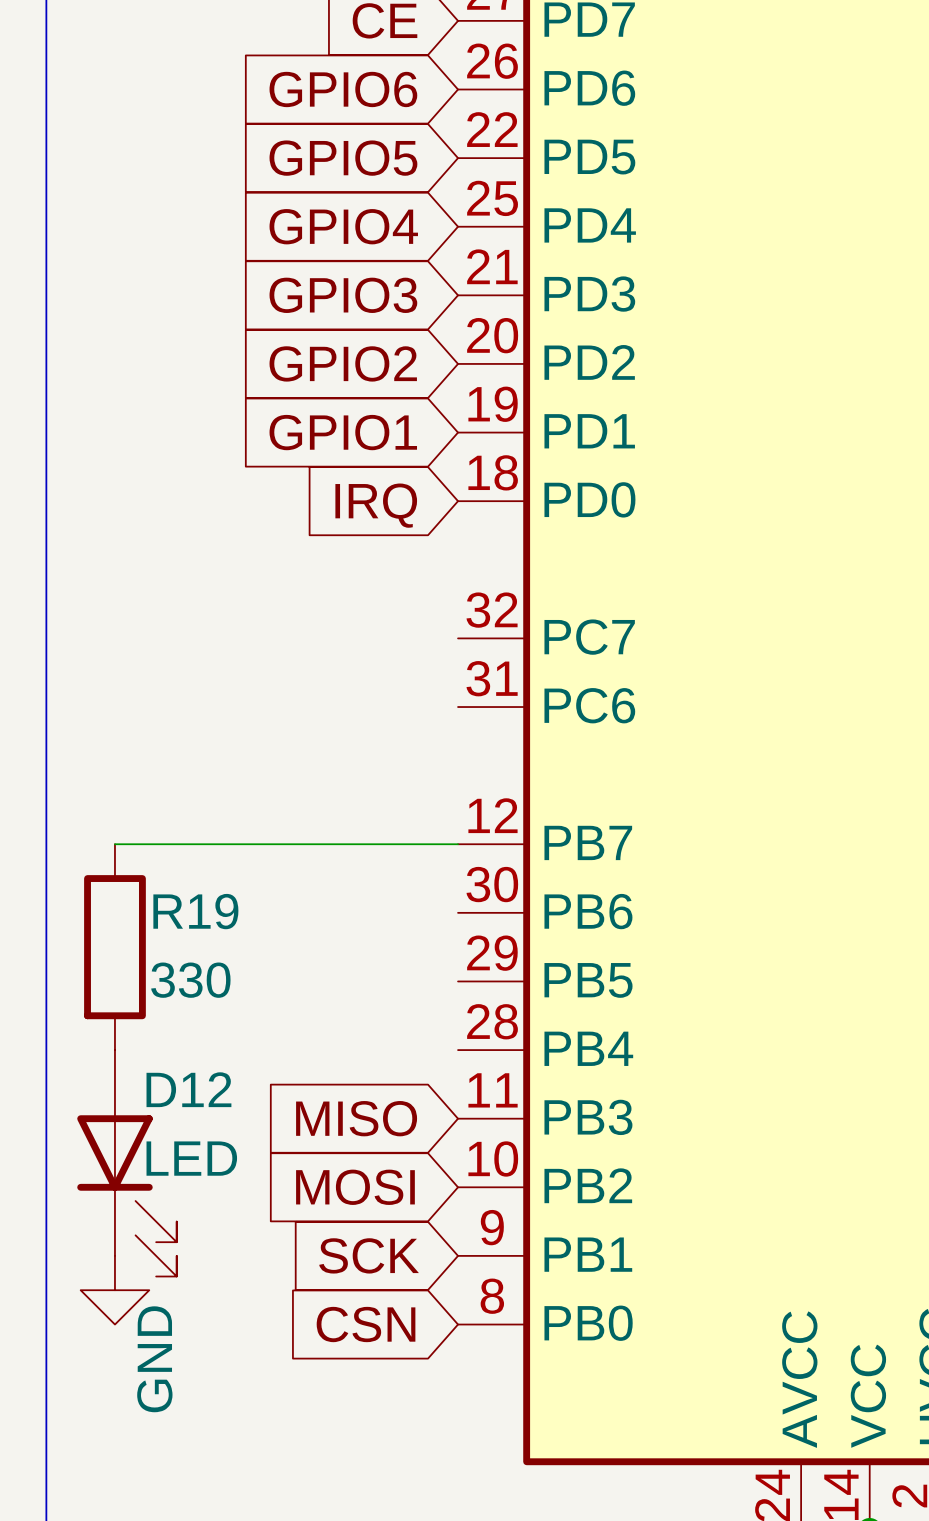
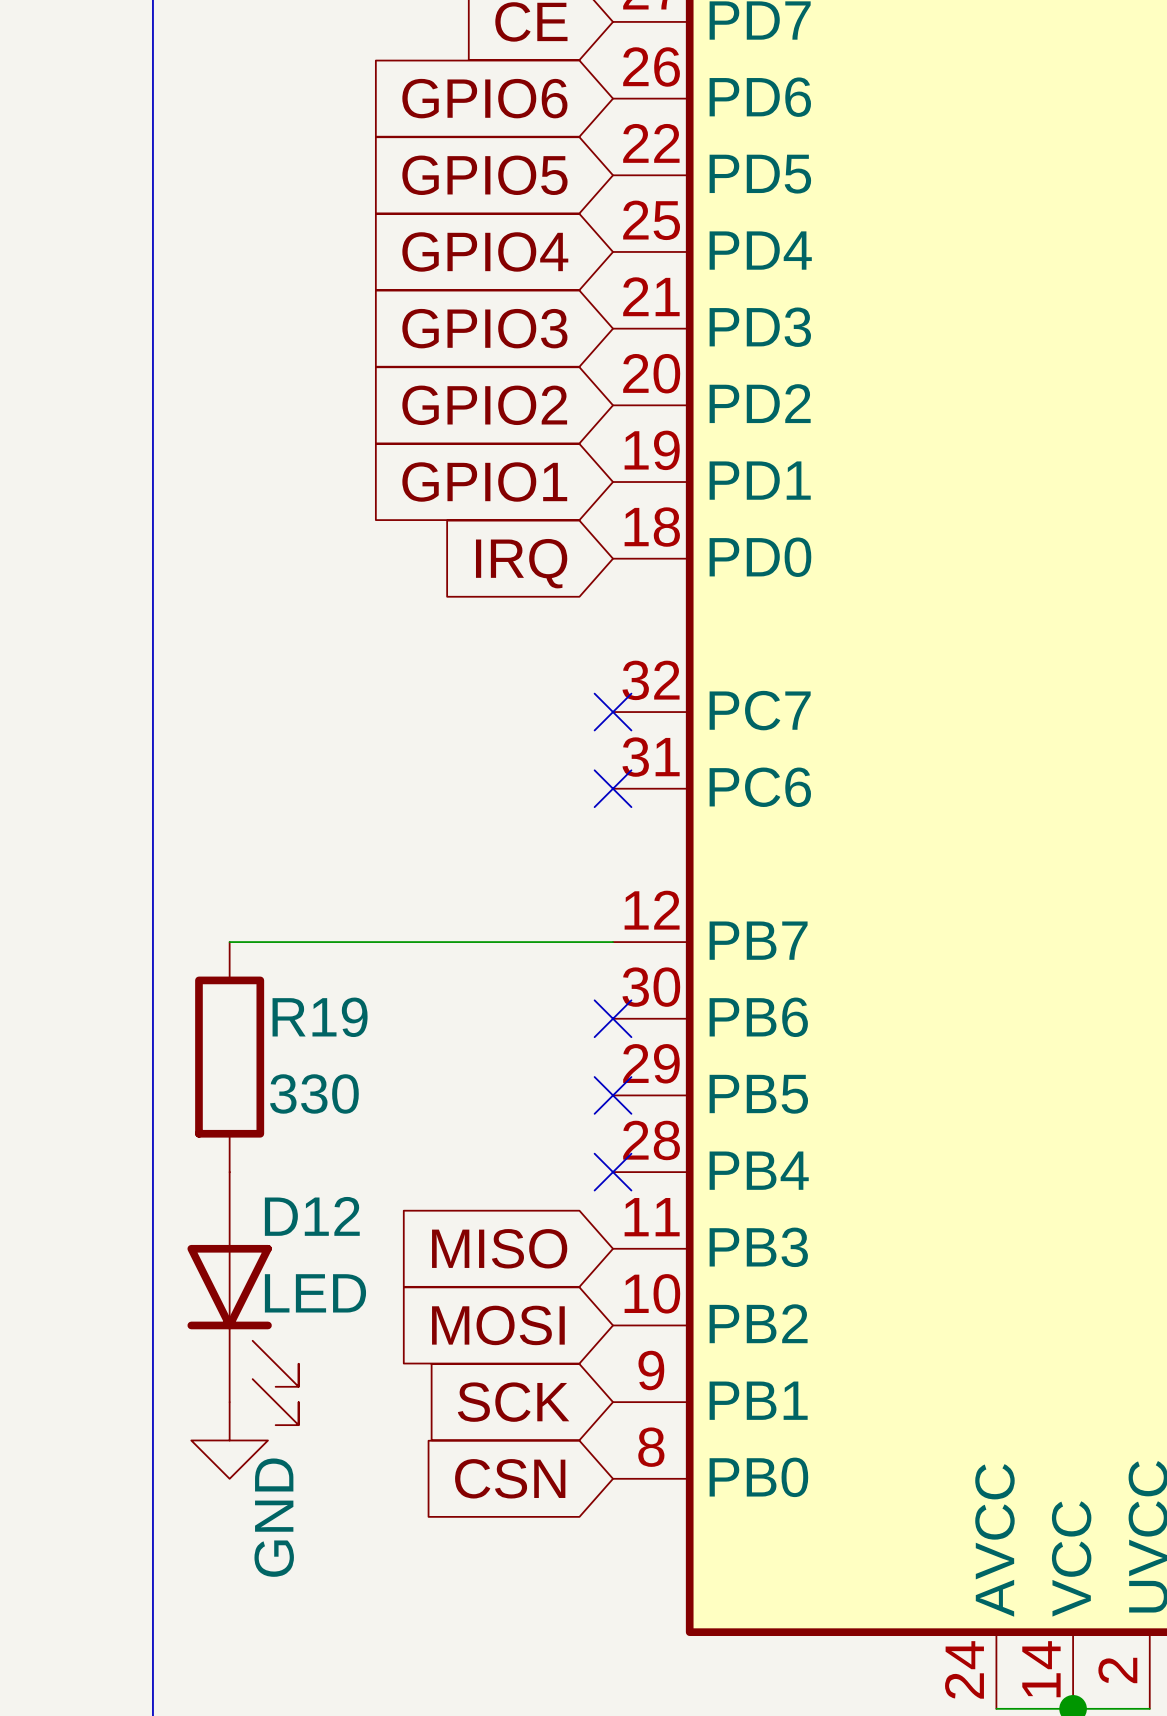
no-connect mark: none -> (613, 712)
no-connect mark: none -> (613, 788)
no-connect mark: none -> (613, 1018)
no-connect mark: none -> (613, 1095)
no-connect mark: none -> (613, 1172)

